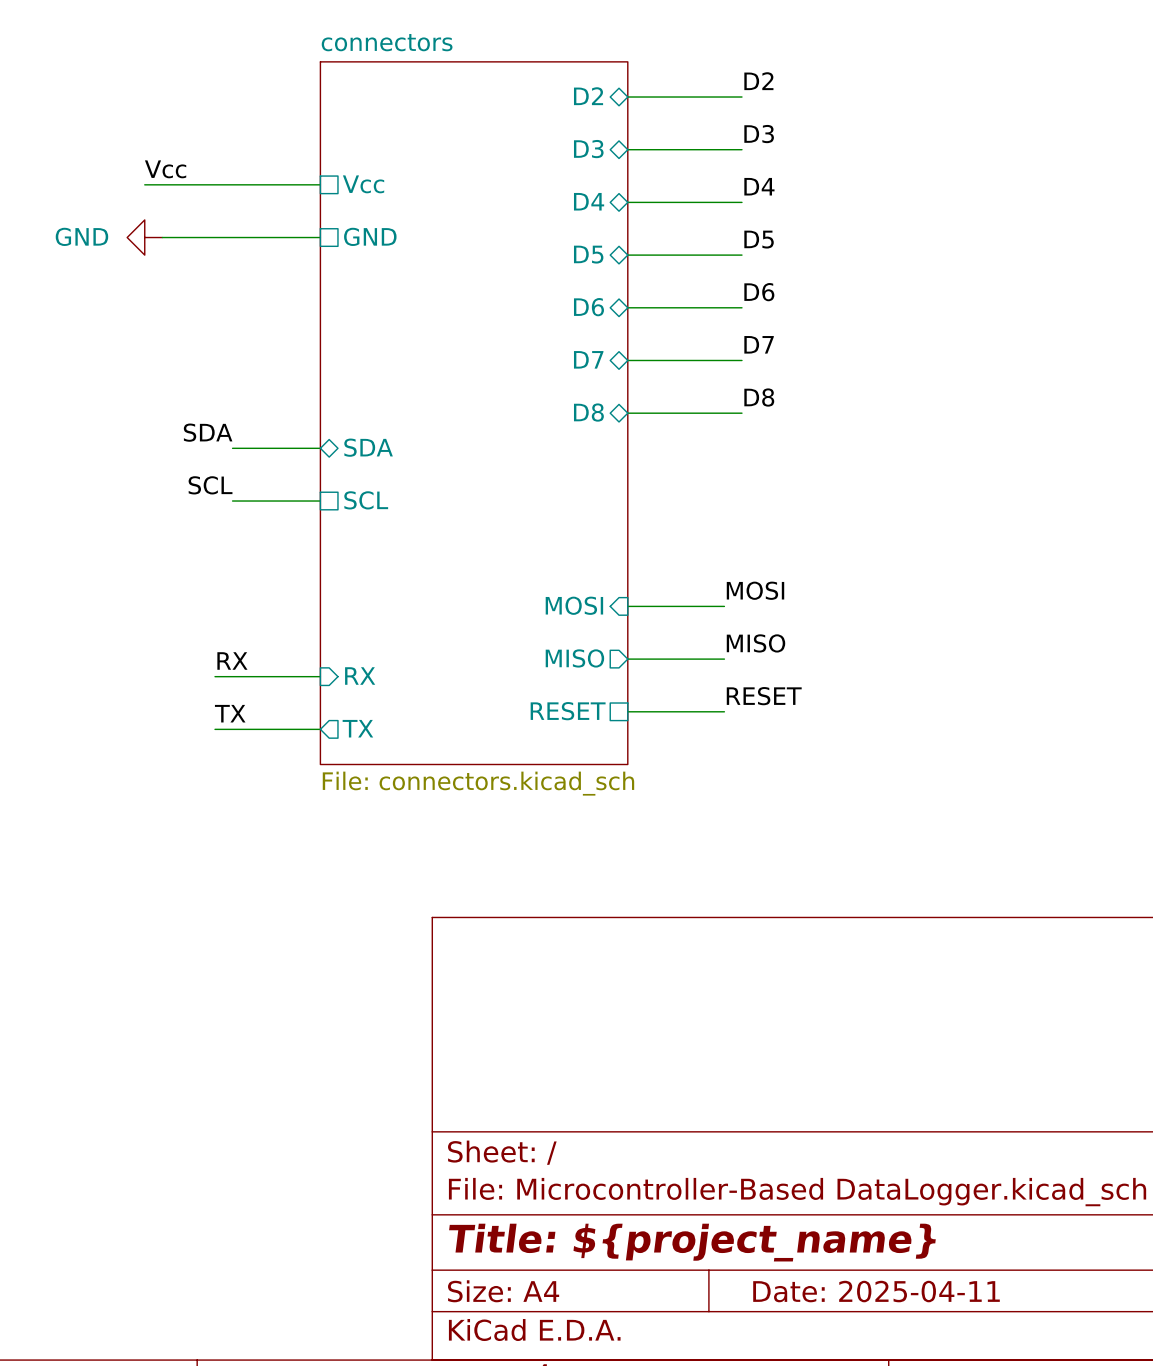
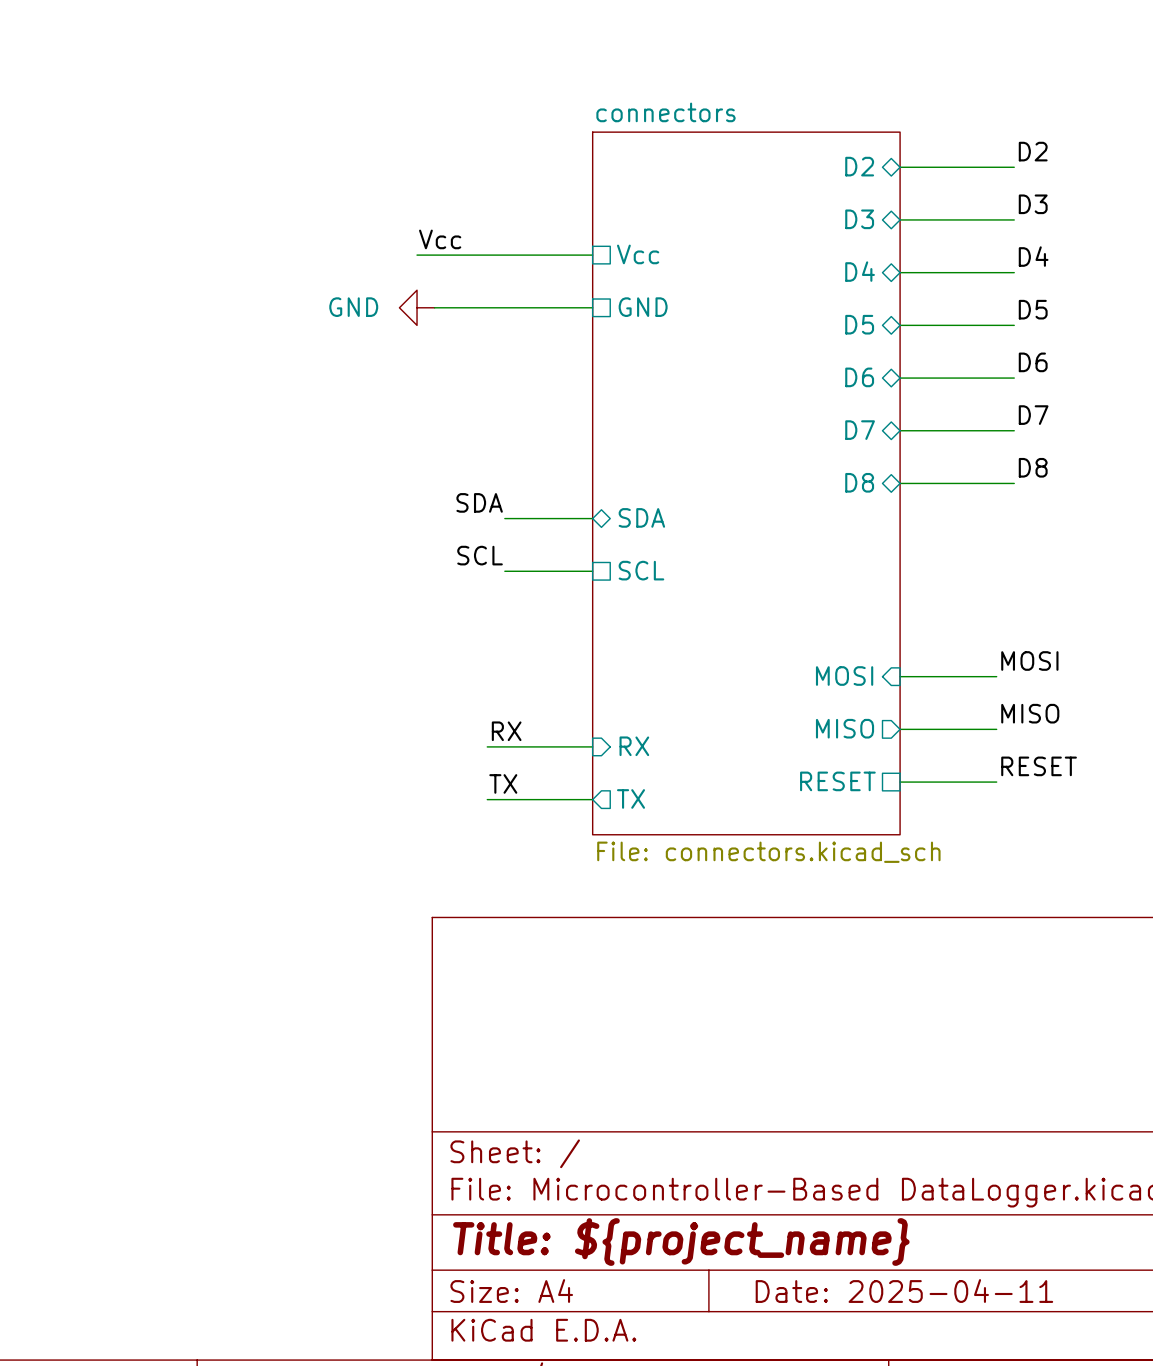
label position: D2 (758, 81) -> D2 (1033, 151)
sheet pin position: D2 (588, 96) -> D2 (859, 166)
wire: (627, 97) (741, 97) -> (900, 167) (1014, 167)
label position: D3 (759, 134) -> D3 (1033, 204)
sheet pin position: D3 (588, 149) -> D3 (859, 219)
wire: (627, 149) (741, 149) -> (900, 219) (1014, 219)
label position: Vcc (165, 169) -> Vcc (440, 239)
wire: (144, 184) (320, 184) -> (417, 255) (592, 255)
sheet pin position: Vcc (363, 184) -> Vcc (638, 254)
label position: D4 (759, 186) -> D4 (1033, 256)
sheet pin position: D4 (589, 201) -> D4 (860, 271)
wire: (627, 202) (741, 202) -> (900, 272) (1014, 272)
sheet pin position: GND (370, 236) -> GND (643, 307)
power symbol position: GND (144, 237) -> GND (417, 307)
wire: (162, 237) (320, 237) -> (434, 307) (592, 307)
label position: D5 (759, 239) -> D5 (1033, 309)
sheet pin position: D5 (588, 254) -> D5 (859, 324)
wire: (627, 255) (741, 255) -> (900, 325) (1014, 325)
label position: D6 (759, 292) -> D6 (1033, 362)
sheet pin position: D6 (588, 307) -> D6 (859, 377)
wire: (627, 307) (741, 307) -> (900, 378) (1014, 378)
label position: D7 (759, 344) -> D7 (1033, 415)
sheet pin position: D7 (588, 359) -> D7 (860, 430)
wire: (627, 360) (741, 360) -> (900, 430) (1014, 430)
label position: D8 (759, 397) -> D8 (1033, 467)
sheet pin position: D8 (588, 412) -> D8 (859, 482)
sheet connectors position: (474, 413) -> (746, 483)
wire: (627, 413) (741, 413) -> (900, 483) (1014, 483)
label position: SDA (208, 432) -> SDA (479, 502)
sheet pin position: SDA (368, 447) -> SDA (641, 517)
wire: (232, 448) (320, 448) -> (504, 518) (592, 518)
label position: SCL (210, 485) -> SCL (480, 555)
sheet pin position: SCL (366, 500) -> SCL (641, 570)
wire: (232, 501) (320, 501) -> (504, 571) (592, 571)
label position: MOSI (755, 590) -> MOSI (1029, 660)
sheet pin position: MOSI (574, 605) -> MOSI (844, 676)
wire: (627, 606) (724, 606) -> (900, 676) (996, 676)
label position: MISO (755, 643) -> MISO (1030, 713)
sheet pin position: MISO (574, 658) -> MISO (845, 728)
wire: (627, 659) (724, 659) -> (900, 729) (996, 729)
label position: RX (232, 660) -> RX (506, 731)
wire: (215, 676) (320, 676) -> (487, 746) (592, 746)
sheet pin position: RX (360, 676) -> RX (634, 746)
label position: RESET (764, 696) -> RESET (1039, 766)
sheet pin position: RESET (568, 711) -> RESET (837, 781)
wire: (627, 711) (724, 711) -> (900, 782) (996, 782)
label position: TX (230, 713) -> TX (503, 783)
sheet pin position: TX (357, 728) -> TX (631, 798)
wire: (215, 729) (320, 729) -> (487, 799) (592, 799)

